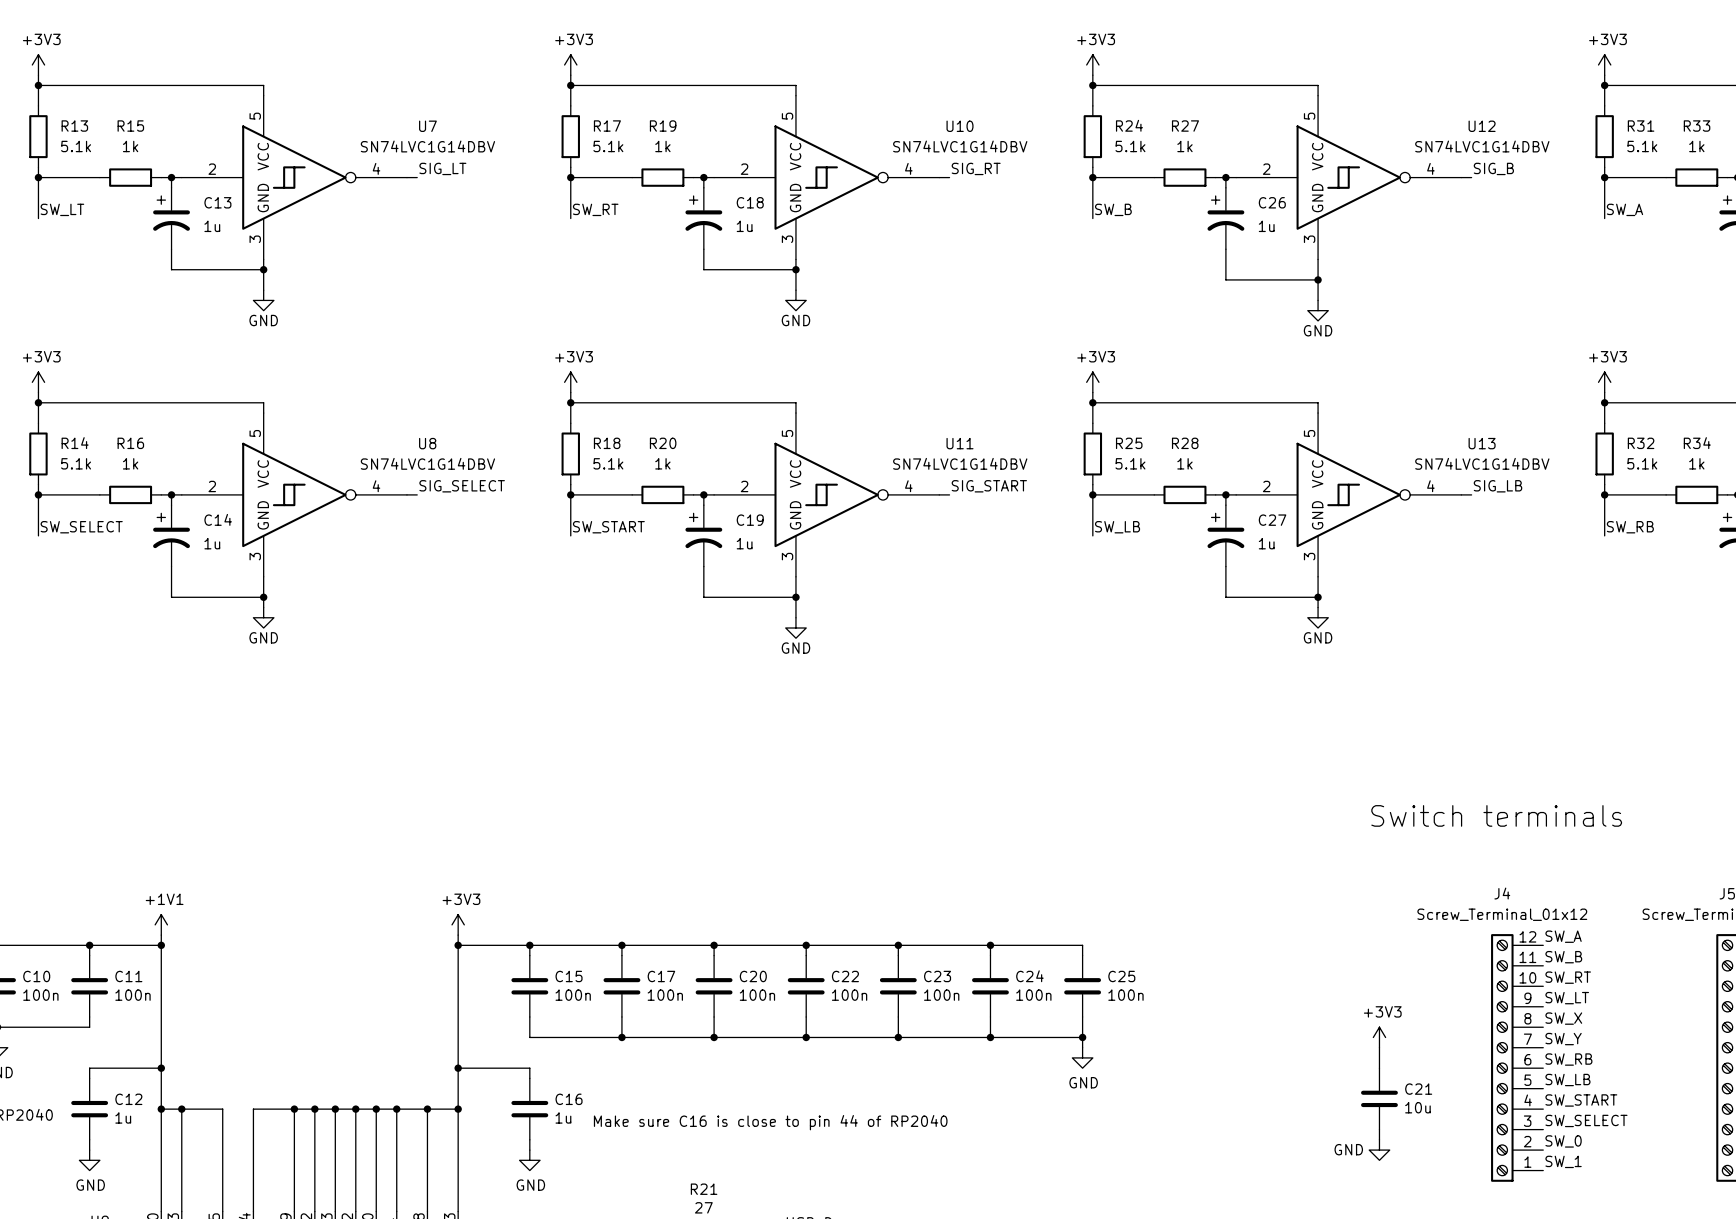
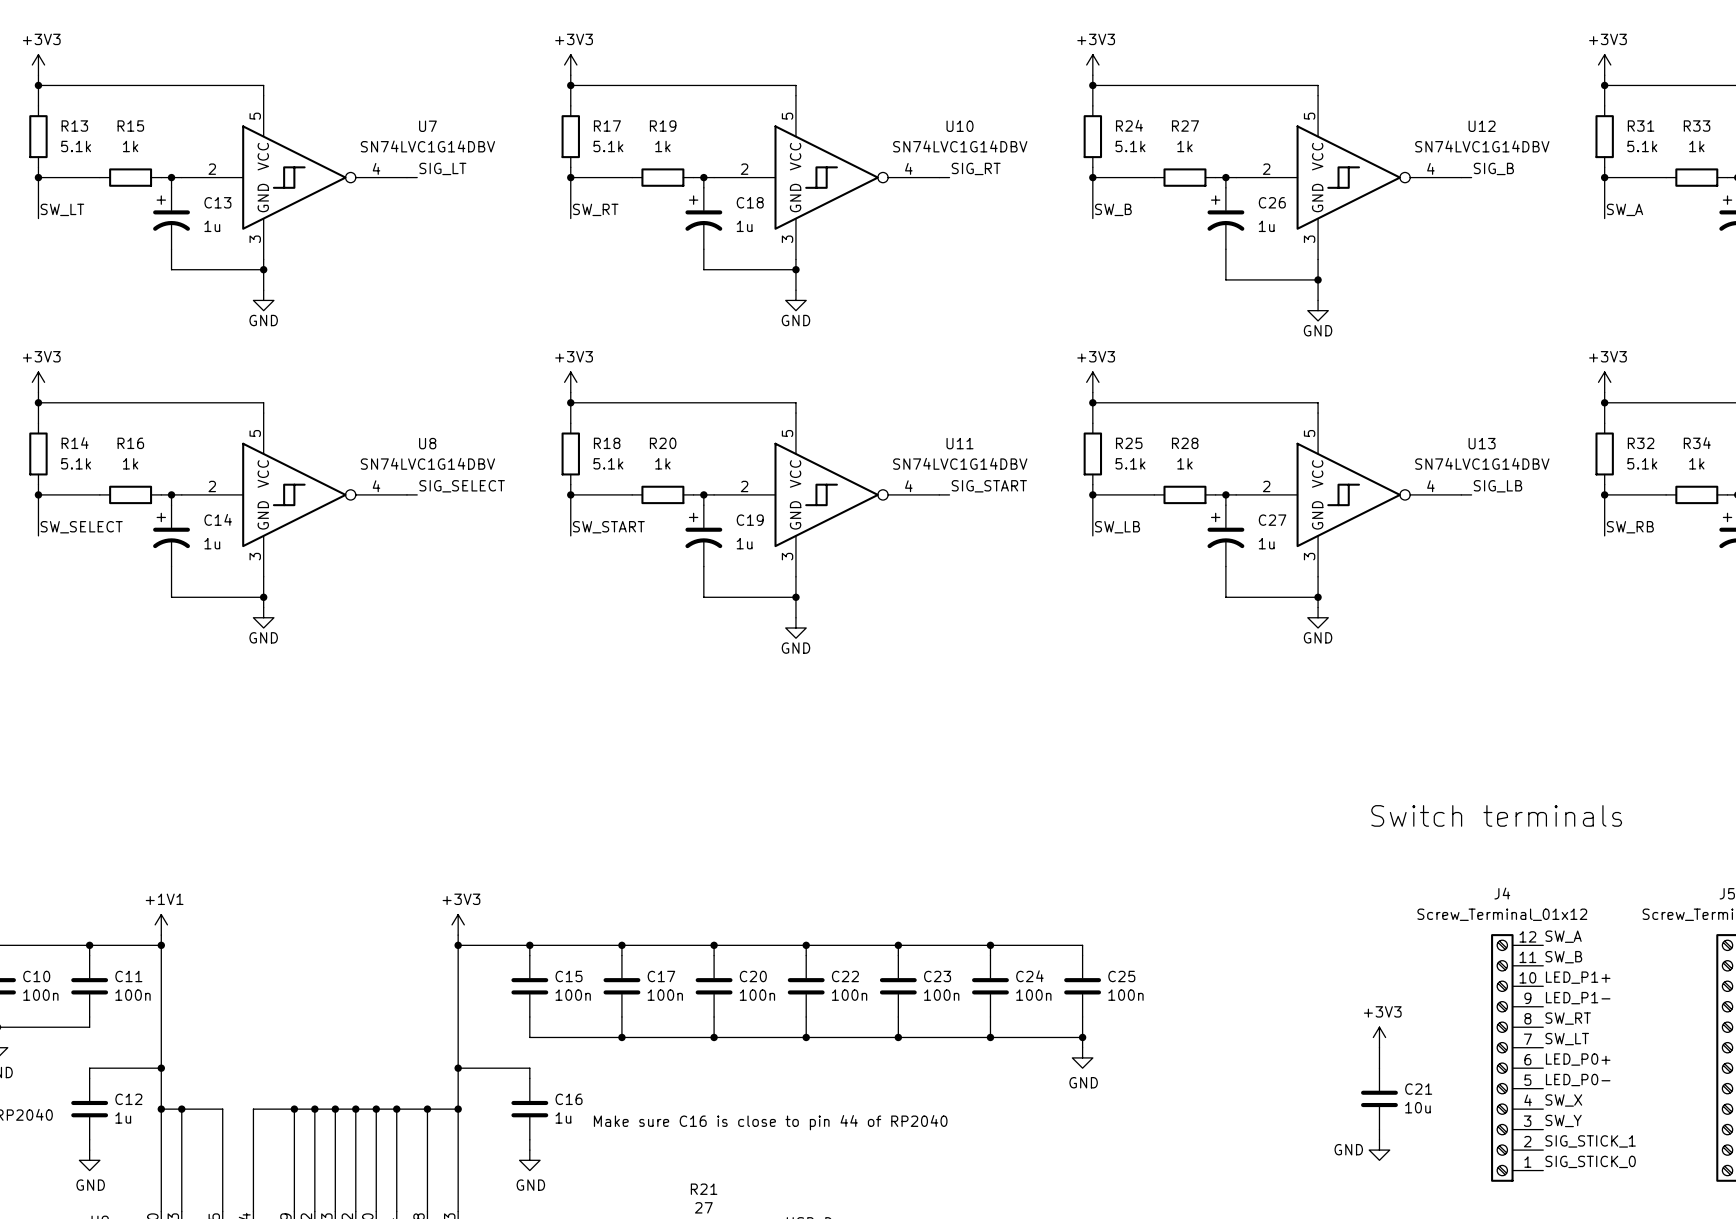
label: SW_RT (1568, 977) -> LED_P1+ (1578, 977)
label: SW_LT (1567, 998) -> LED_P1- (1578, 998)
label: SW_X (1563, 1018) -> SW_RT (1568, 1018)
label: SW_Y (1563, 1039) -> SW_LT (1567, 1039)
label: SW_RB (1568, 1059) -> LED_P0+ (1578, 1059)
label: SW_LB (1567, 1080) -> LED_P0- (1578, 1080)
label: SW_START (1581, 1100) -> SW_X (1563, 1100)
label: SW_SELECT (1586, 1120) -> SW_Y (1563, 1120)
label: SW_0 (1563, 1141) -> SIG_STICK_1 (1590, 1141)
label: SW_1 (1563, 1161) -> SIG_STICK_0 (1590, 1161)

